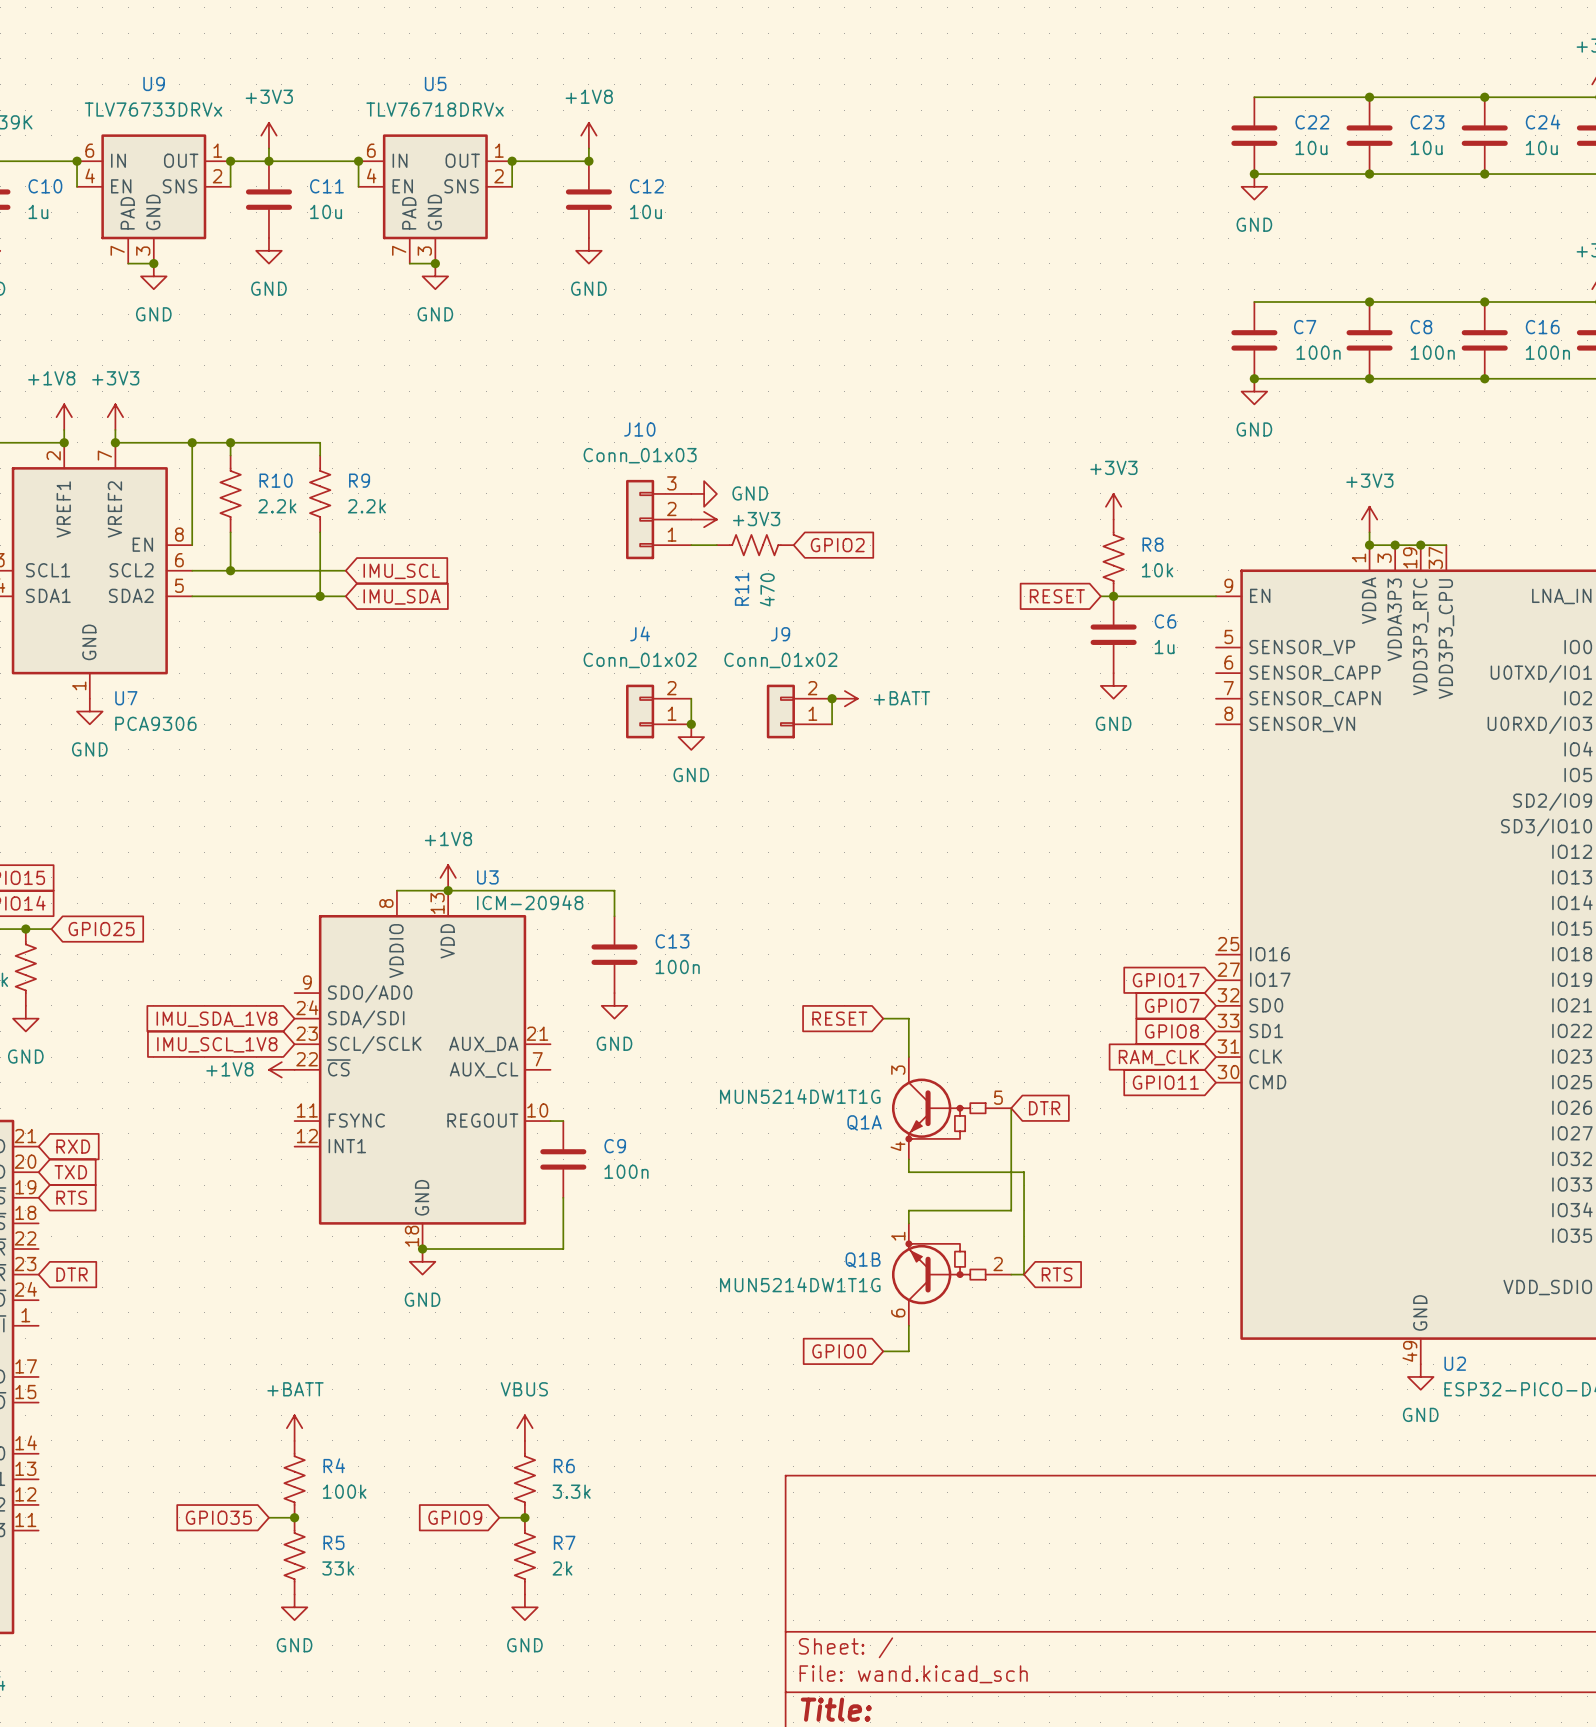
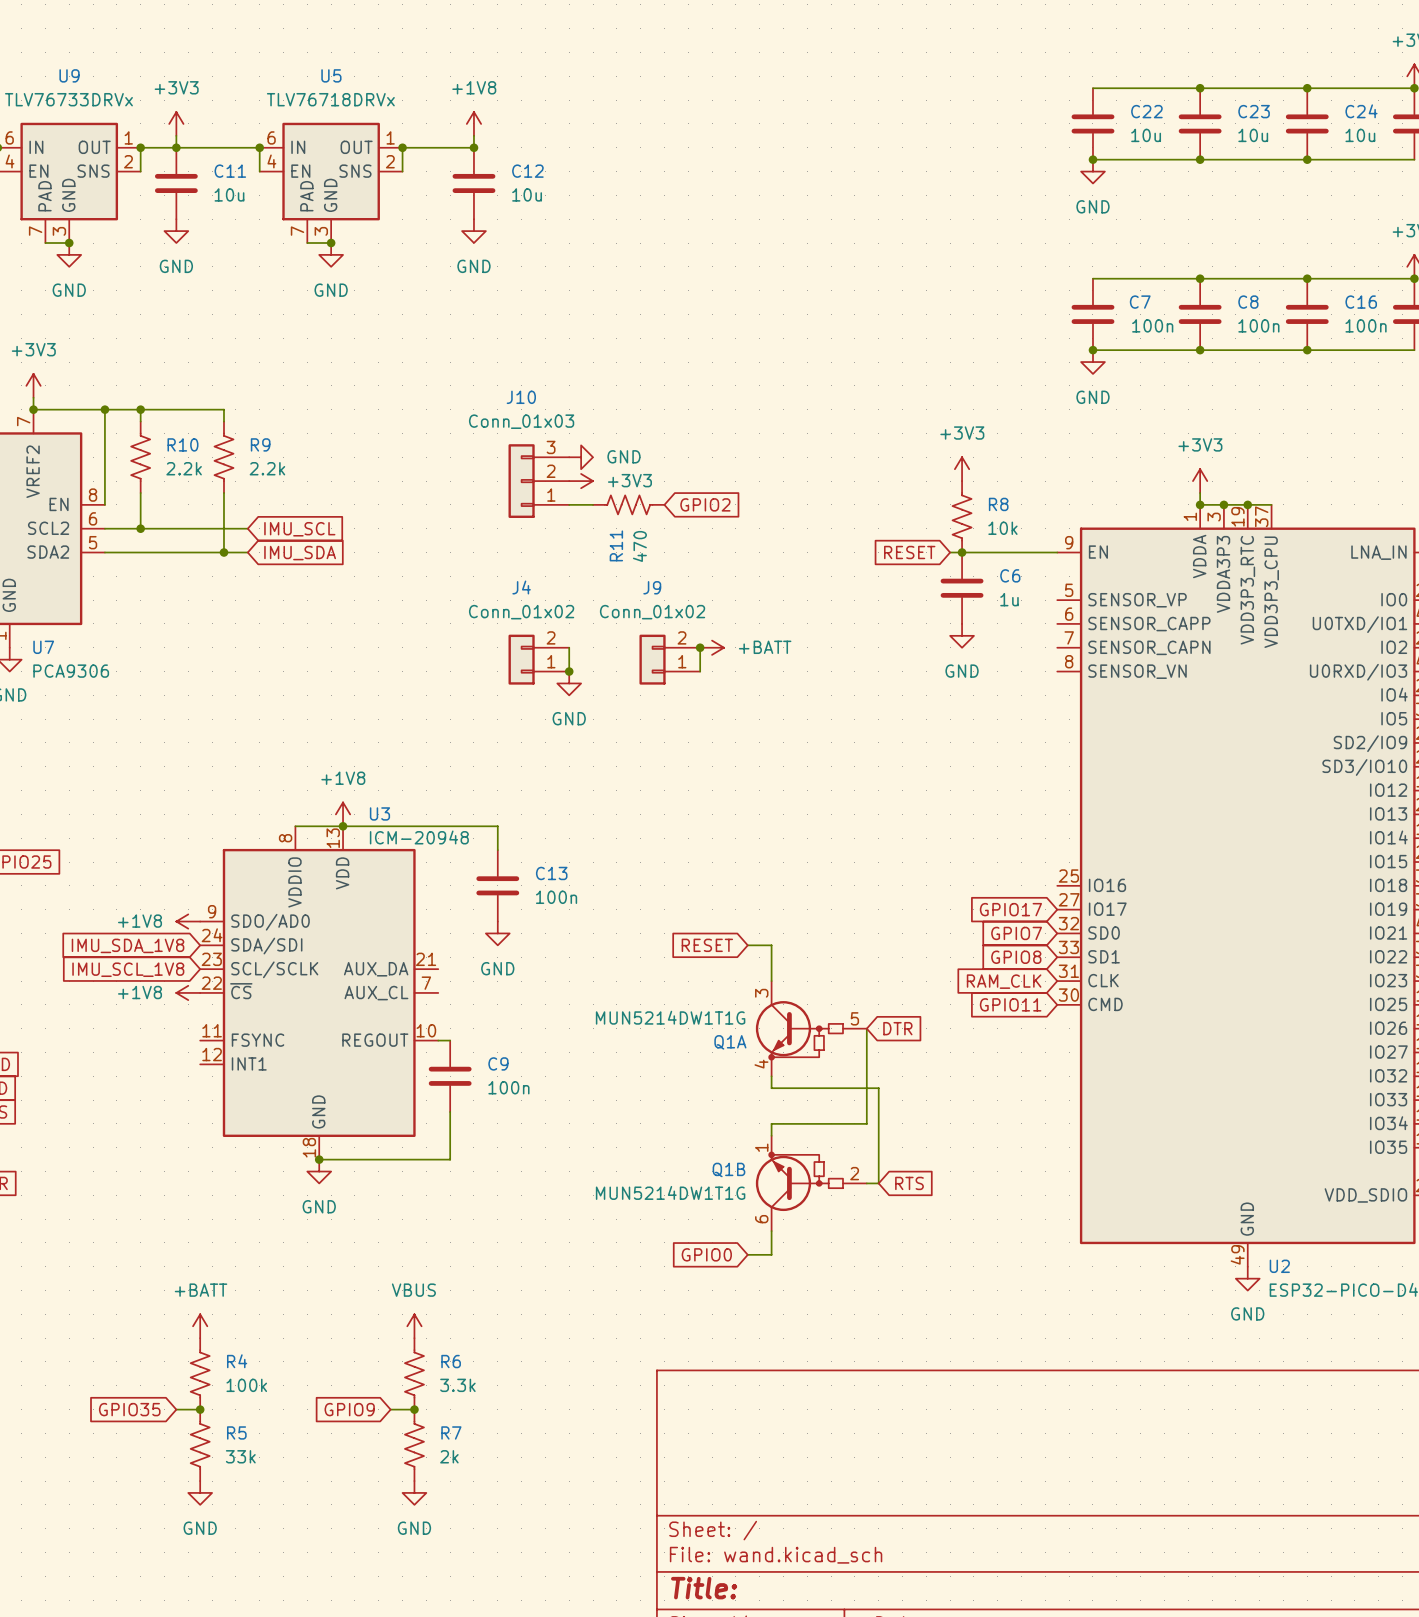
power symbol: none -> +1V8 (188, 921)

